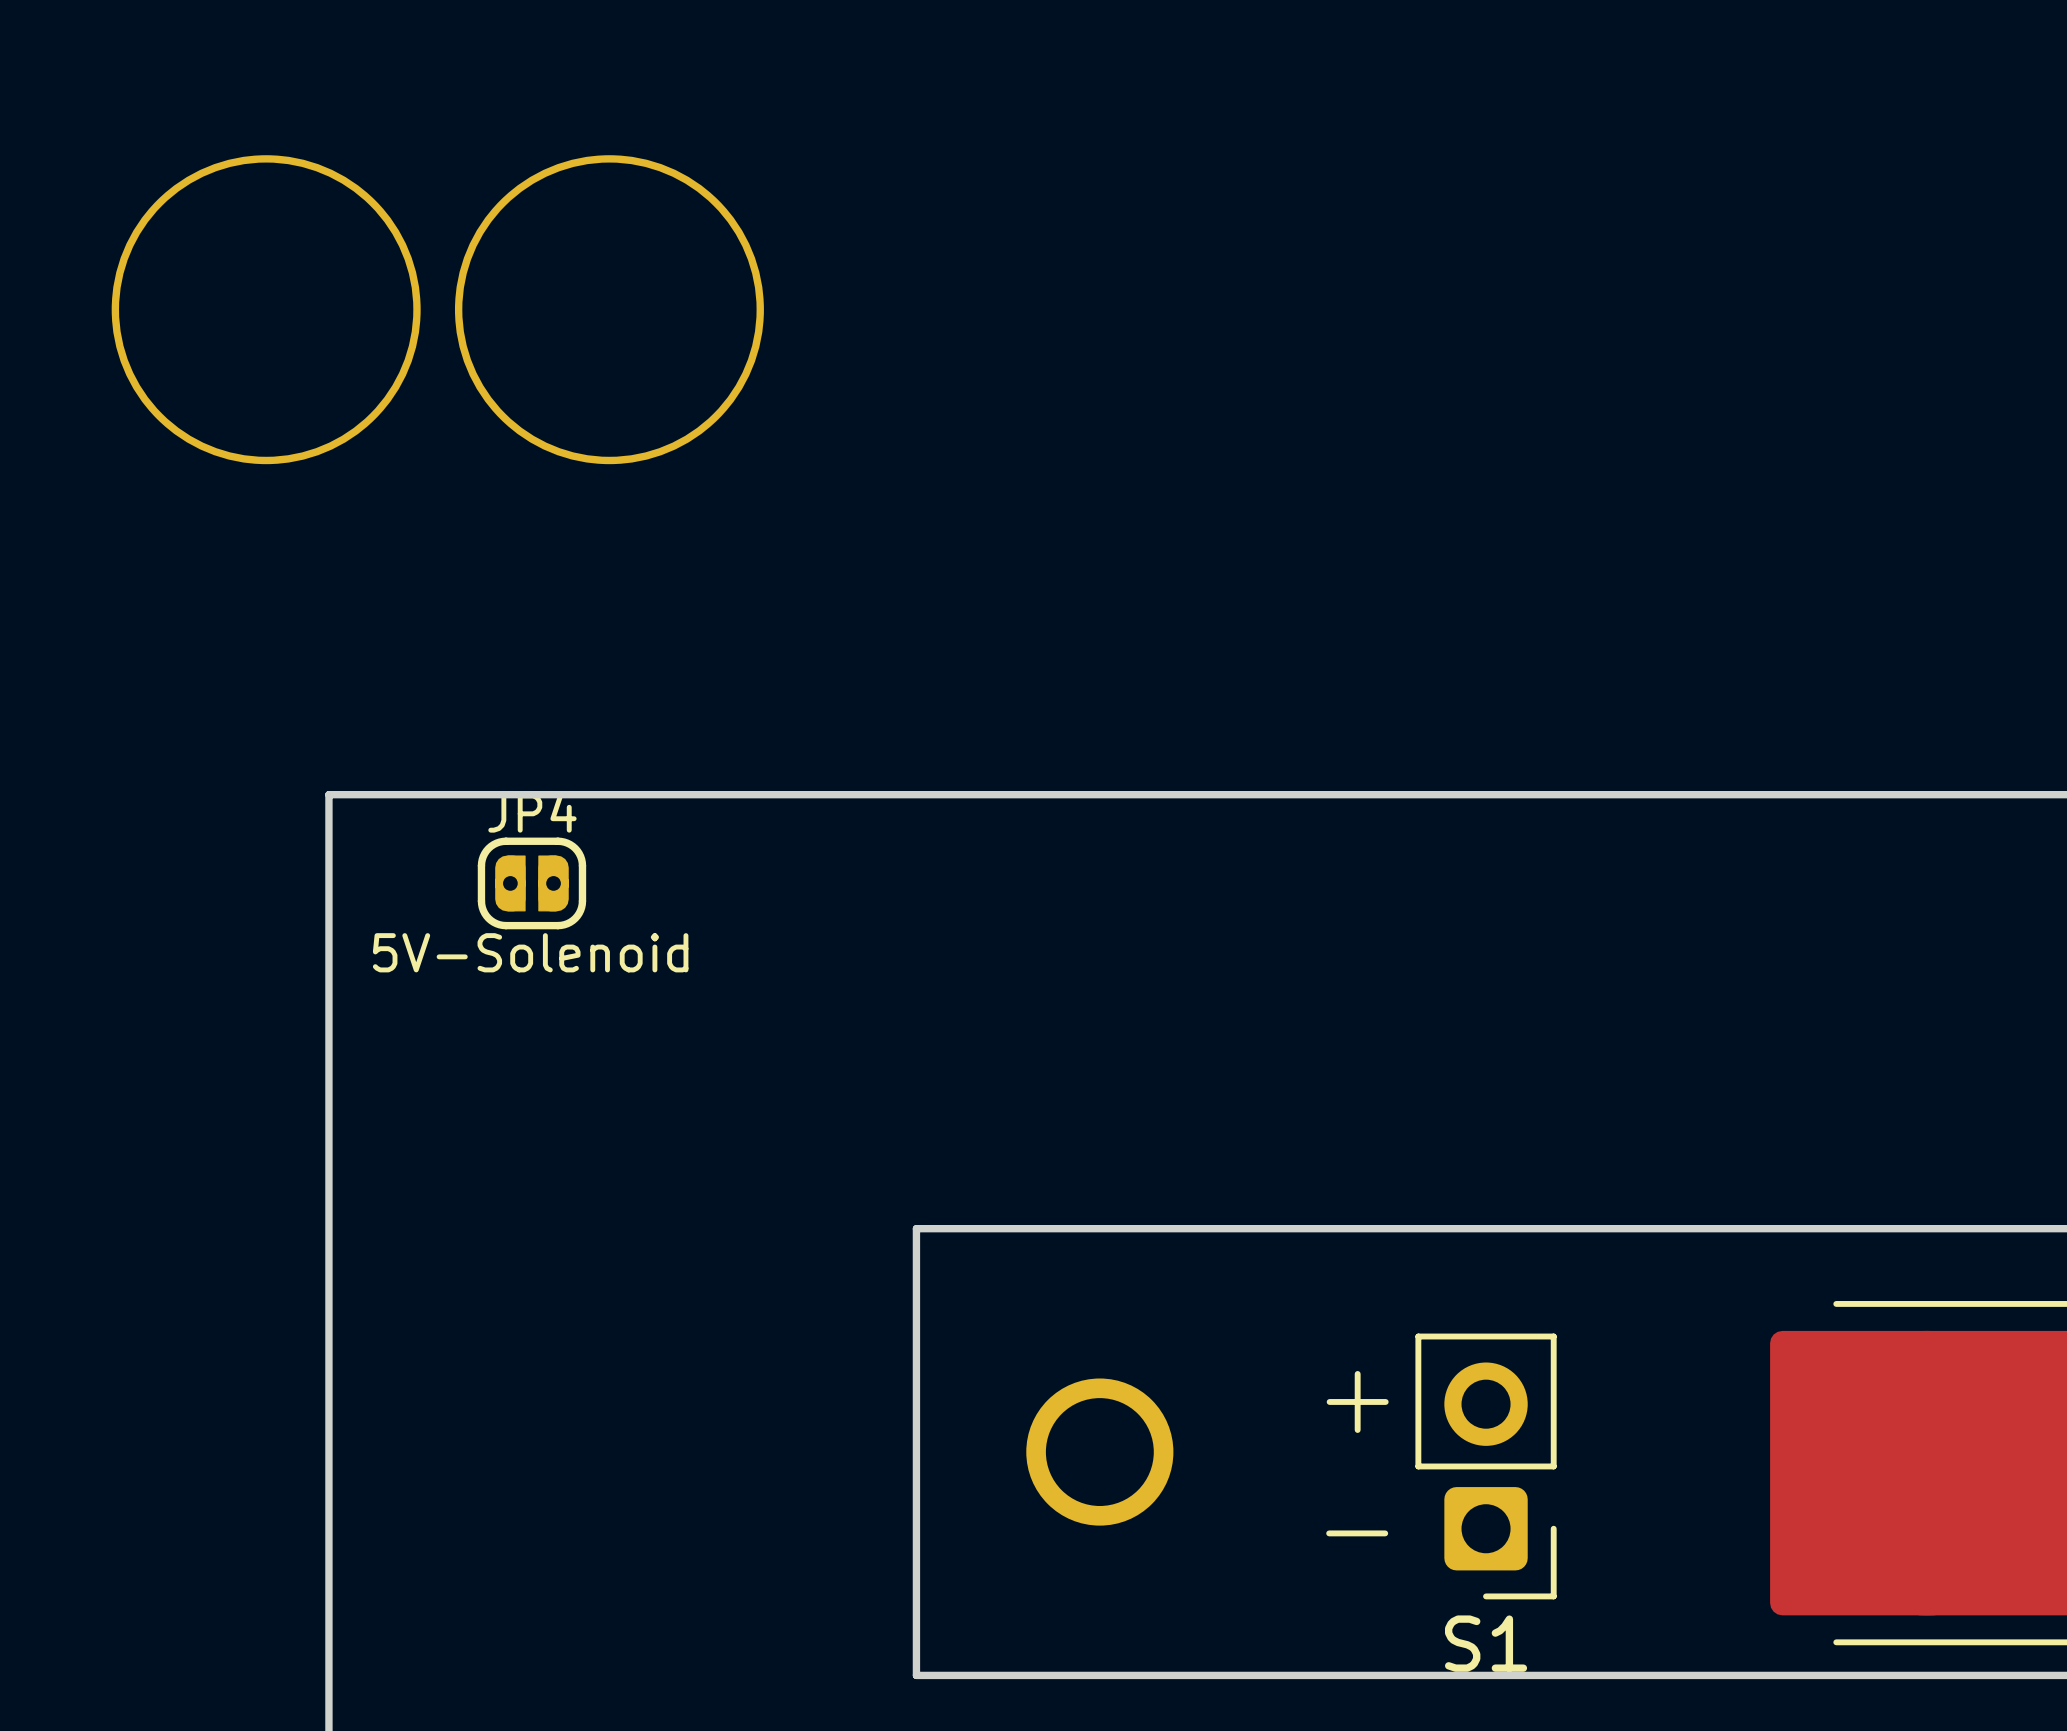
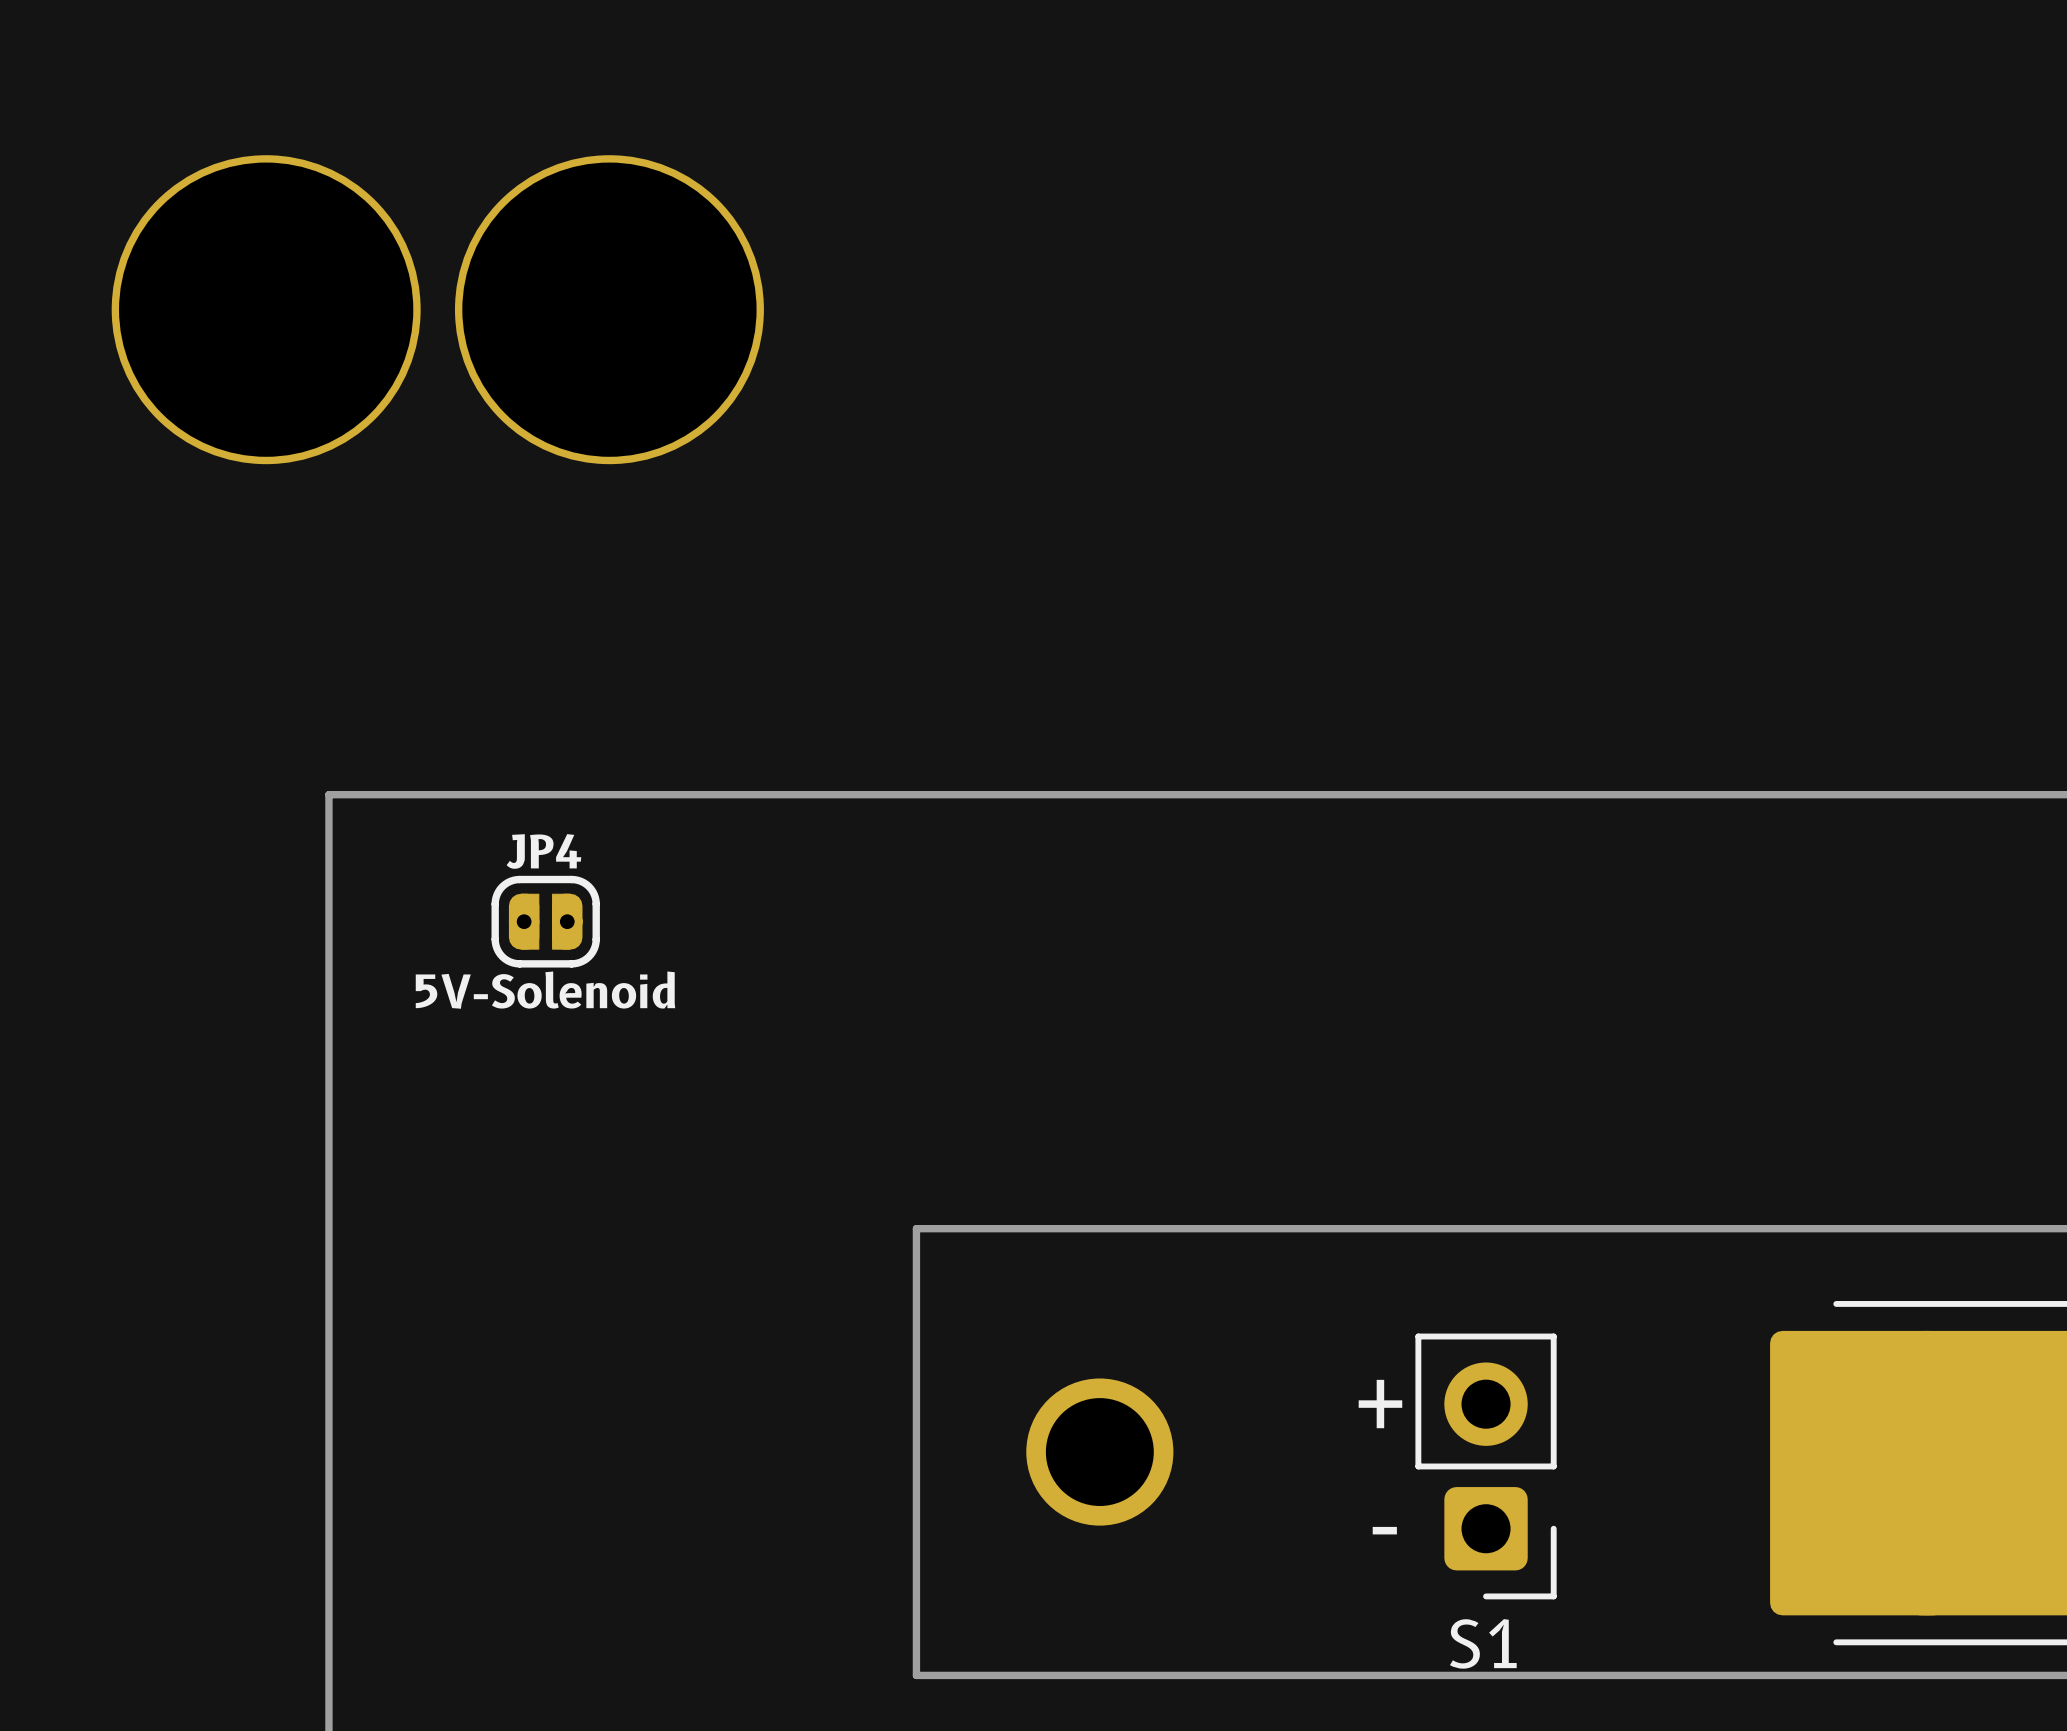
JP4 position: (531, 883) -> (545, 921)

